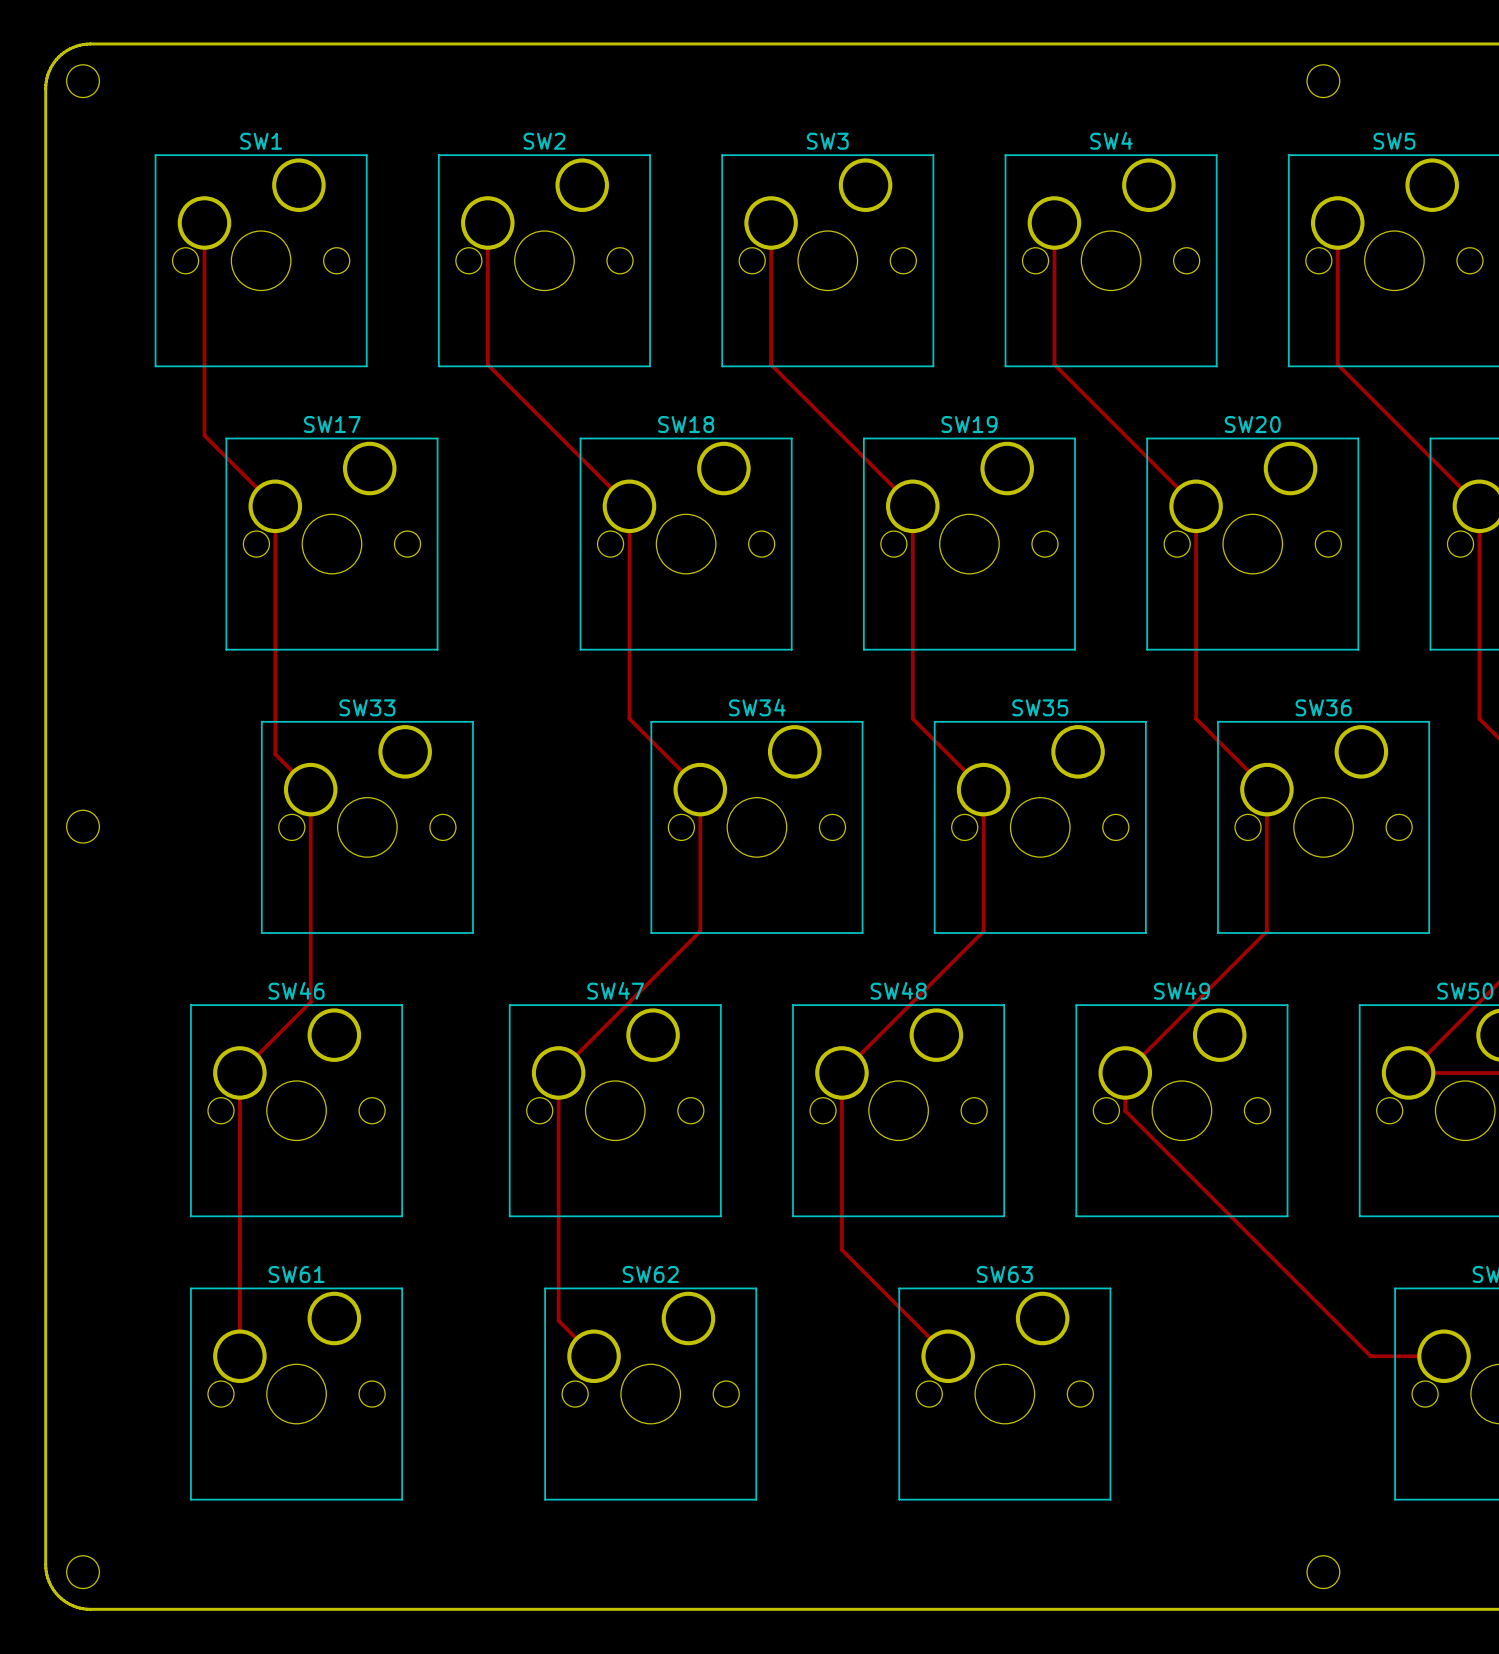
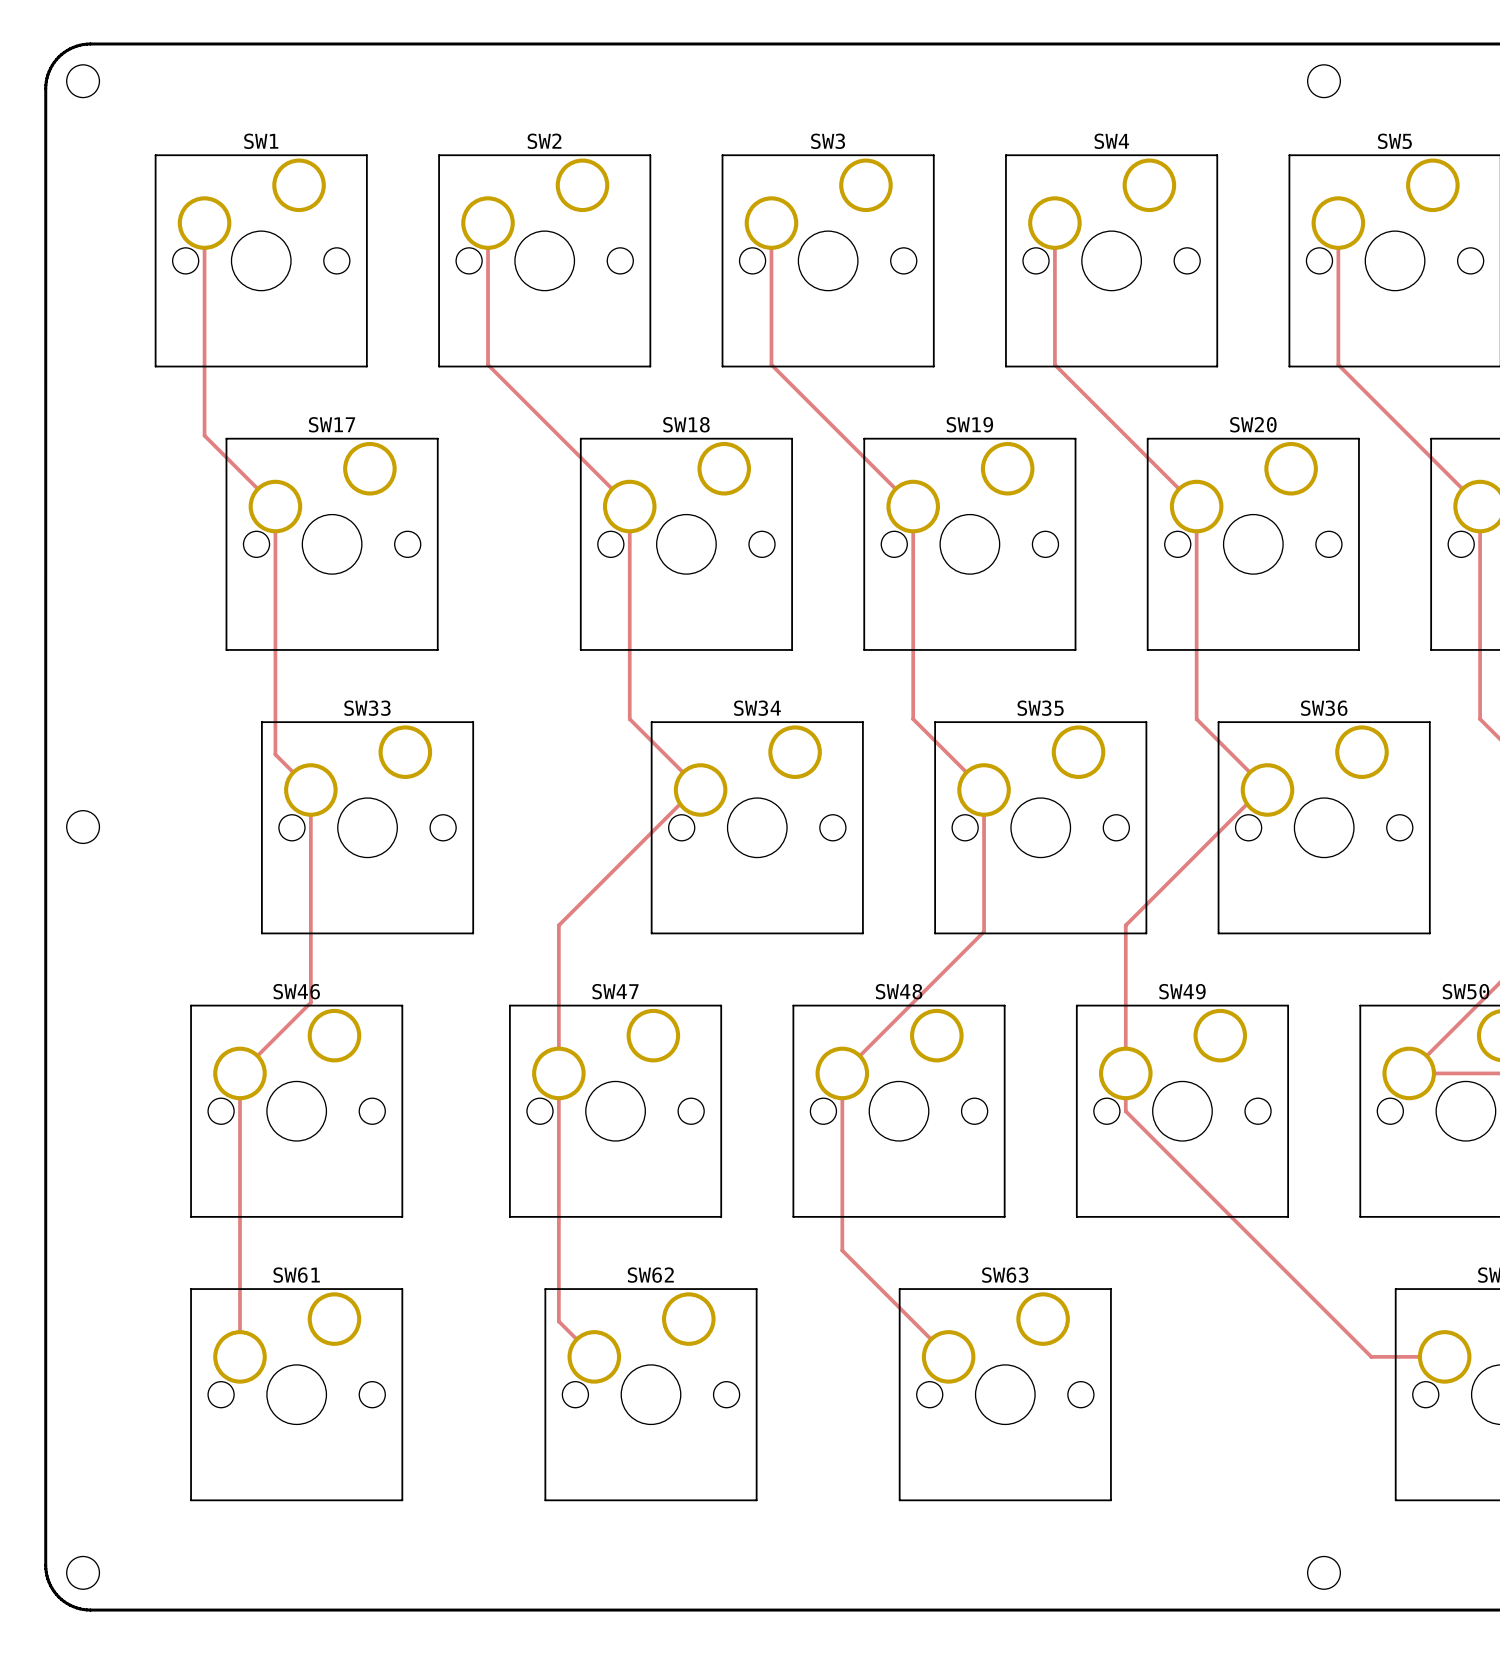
track: (700, 789) (700, 931) (558, 1072) -> (700, 789) (694, 789) (558, 925) (558, 1073)
track: (1266, 789) (1266, 931) (1125, 1072) -> (1267, 789) (1261, 789) (1125, 925) (1125, 1073)

